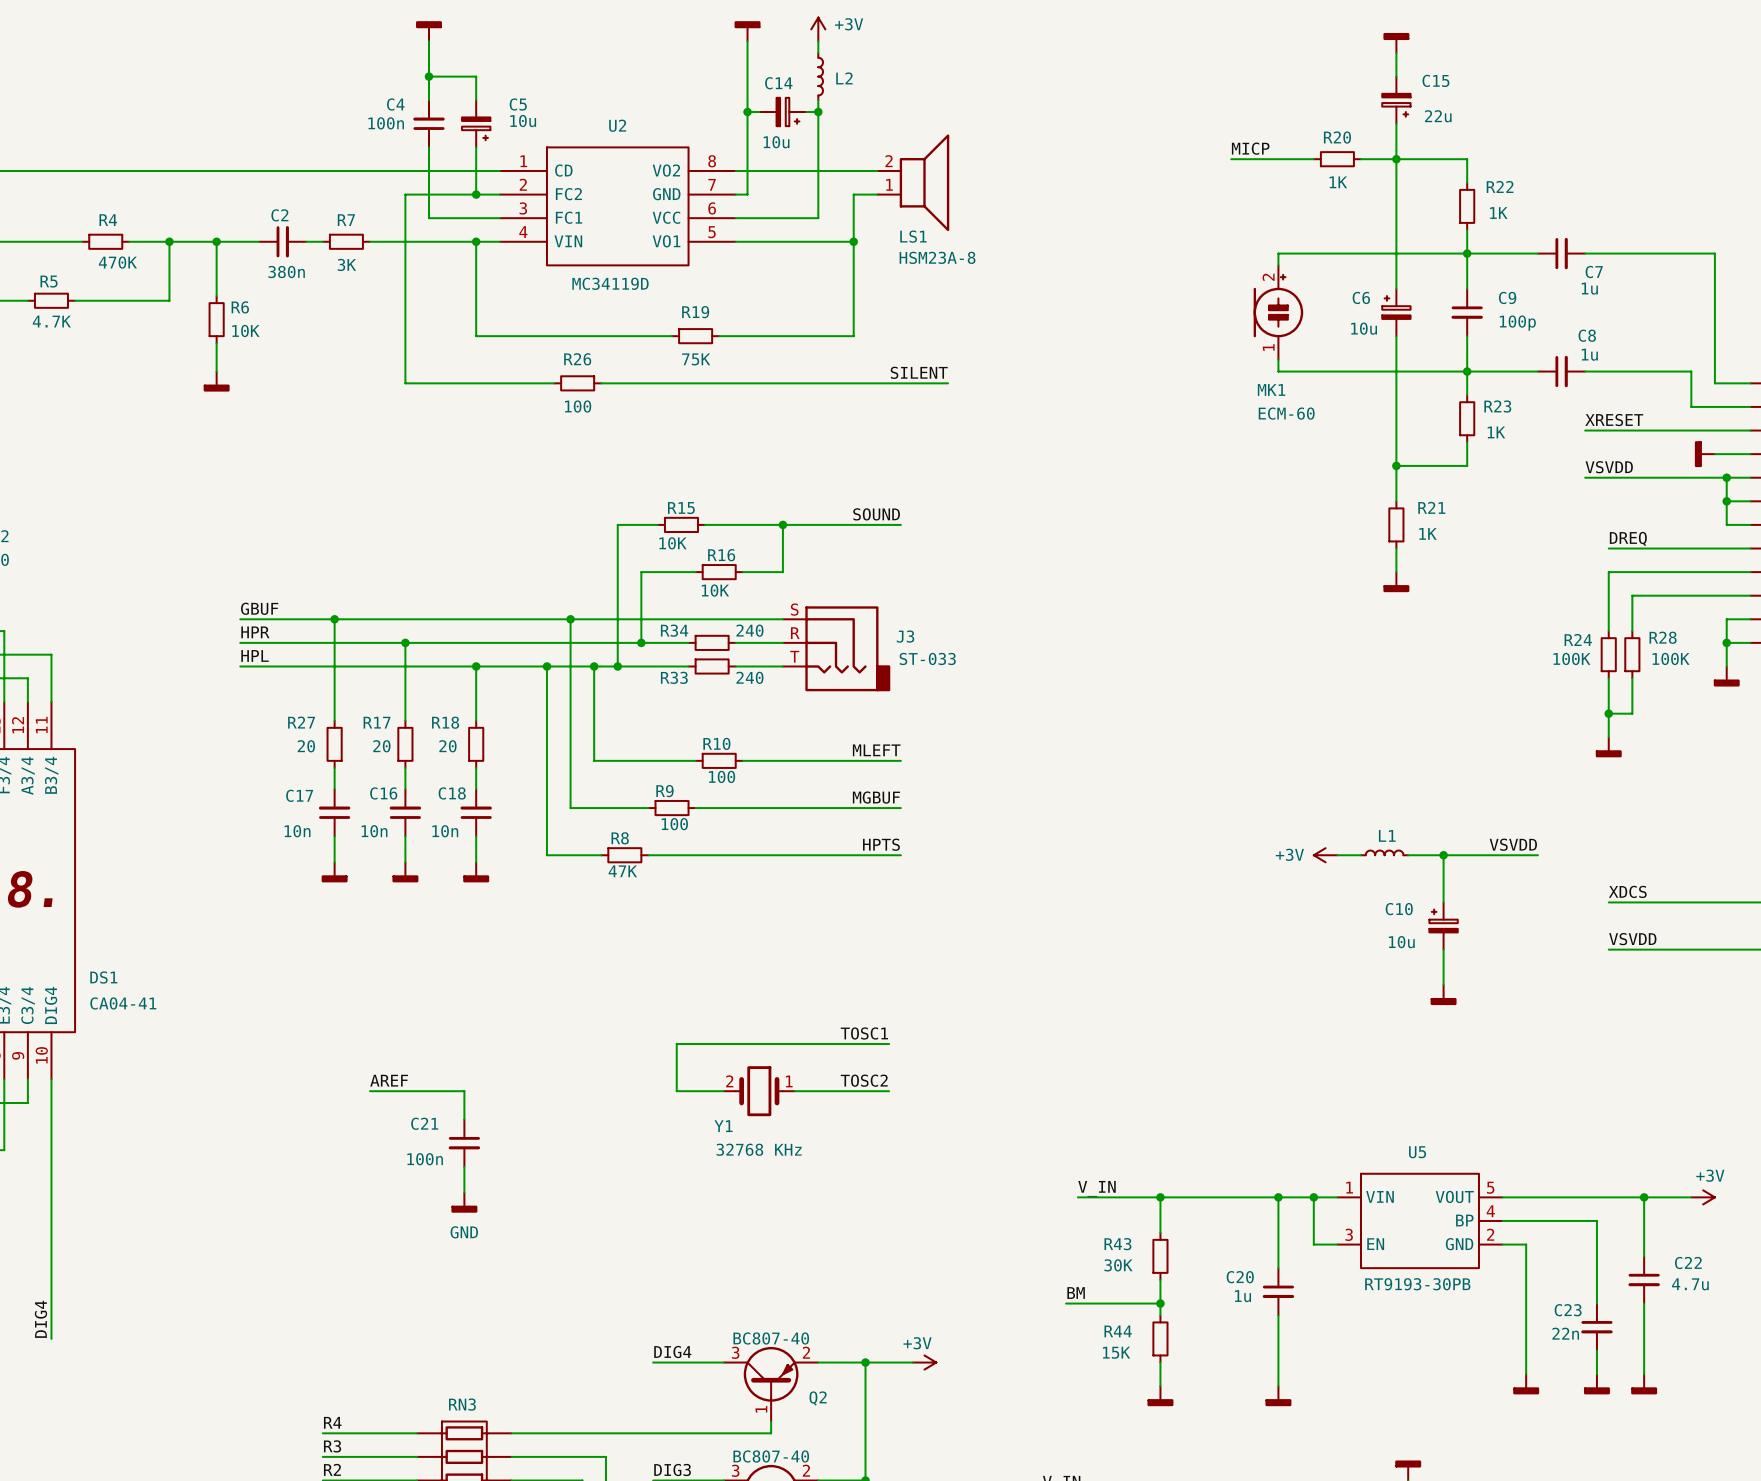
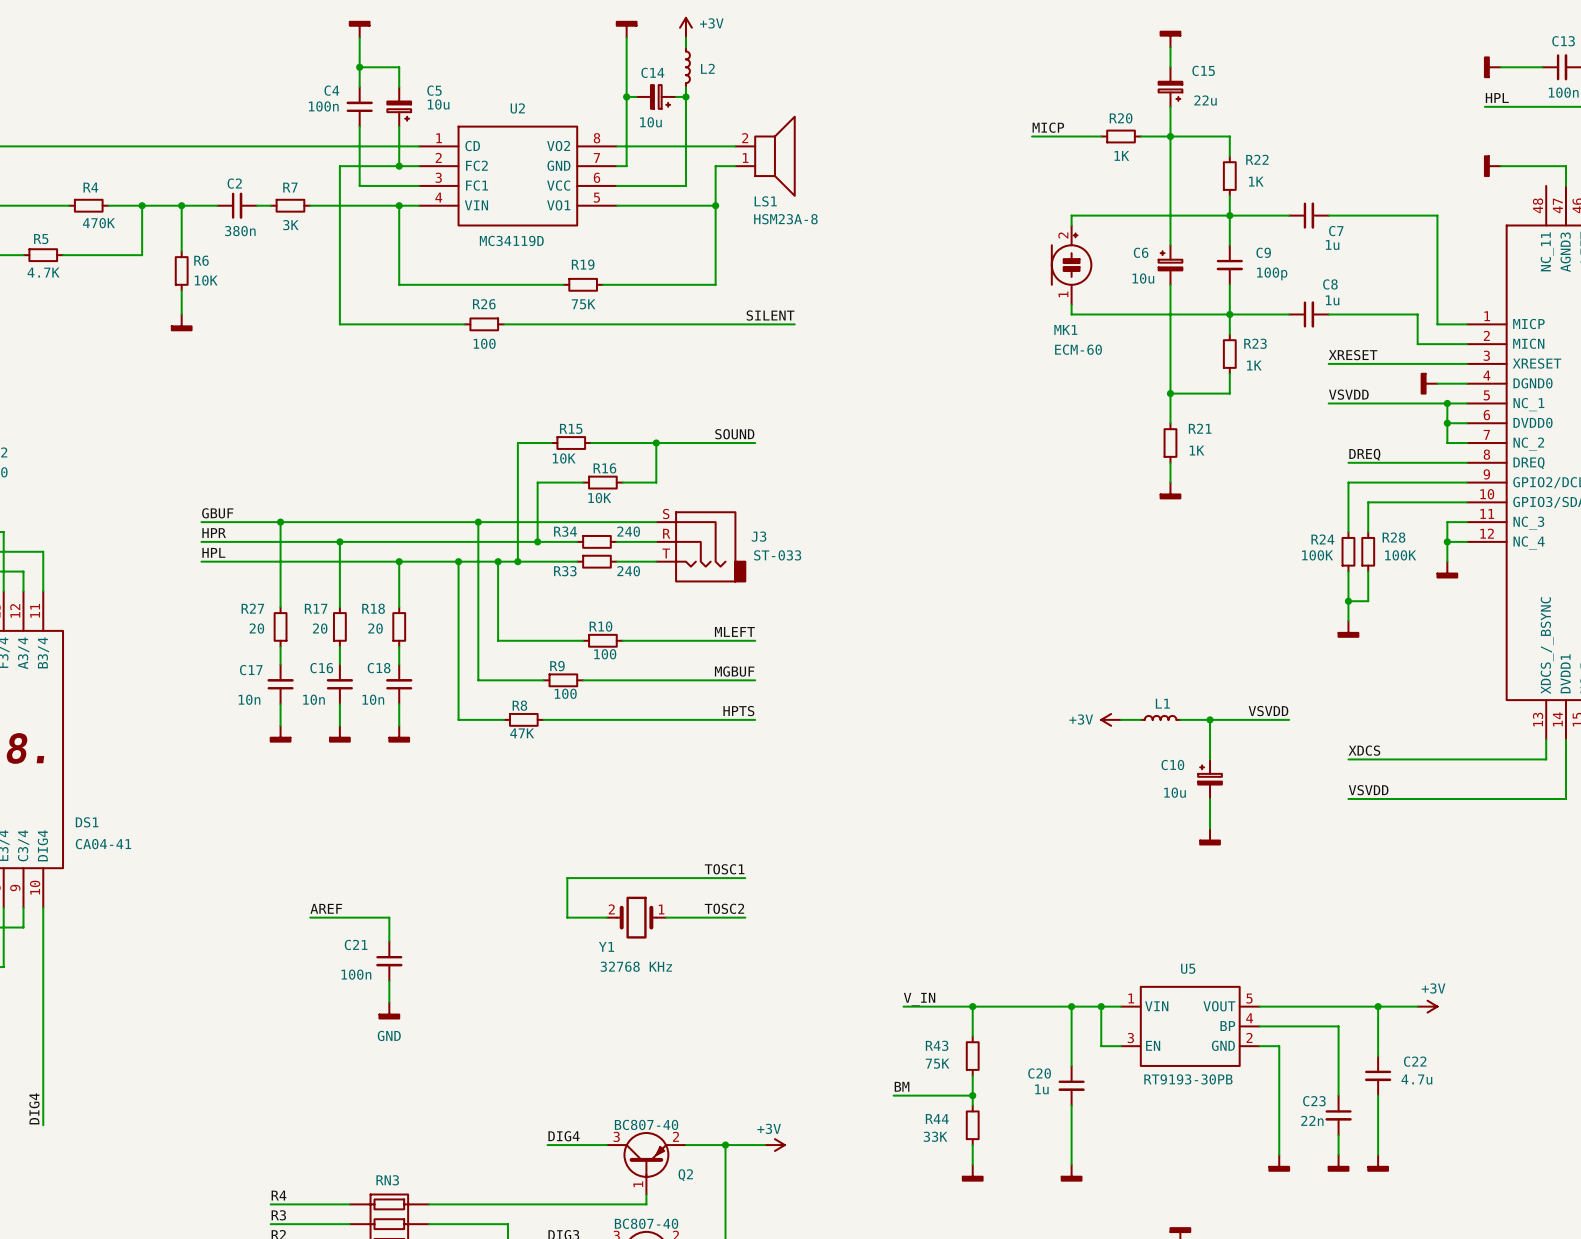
R43 value: 30K (1118, 1265) -> 75K (937, 1063)
R44 value: 15K (1116, 1352) -> 33K (935, 1136)

